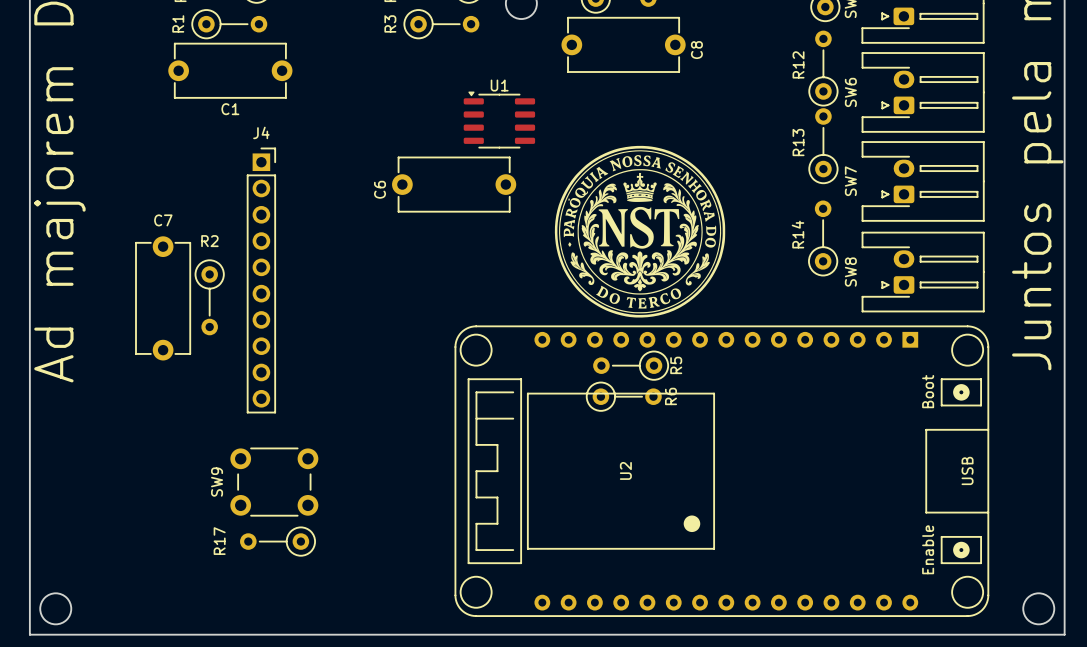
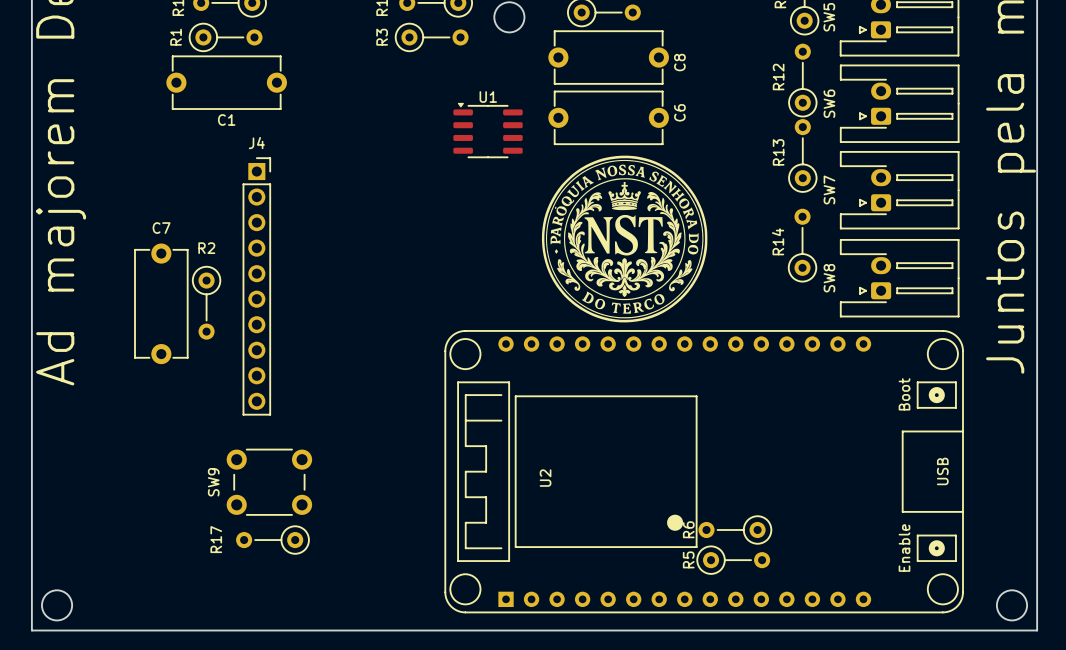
C6 position: (454, 184) -> (608, 117)
C6 name position: C6 (380, 189) -> C6 (679, 112)
U2 footprint: [454, 325, 989, 617] -> [444, 330, 964, 614]
R5 rotation: 0° (630, 365) -> 180° (733, 560)
R5 position: (630, 365) -> (733, 560)
R6 rotation: 0° (623, 396) -> 180° (735, 529)
R6 position: (623, 396) -> (735, 529)
U2 name position: U2 (625, 470) -> U2 (545, 478)

